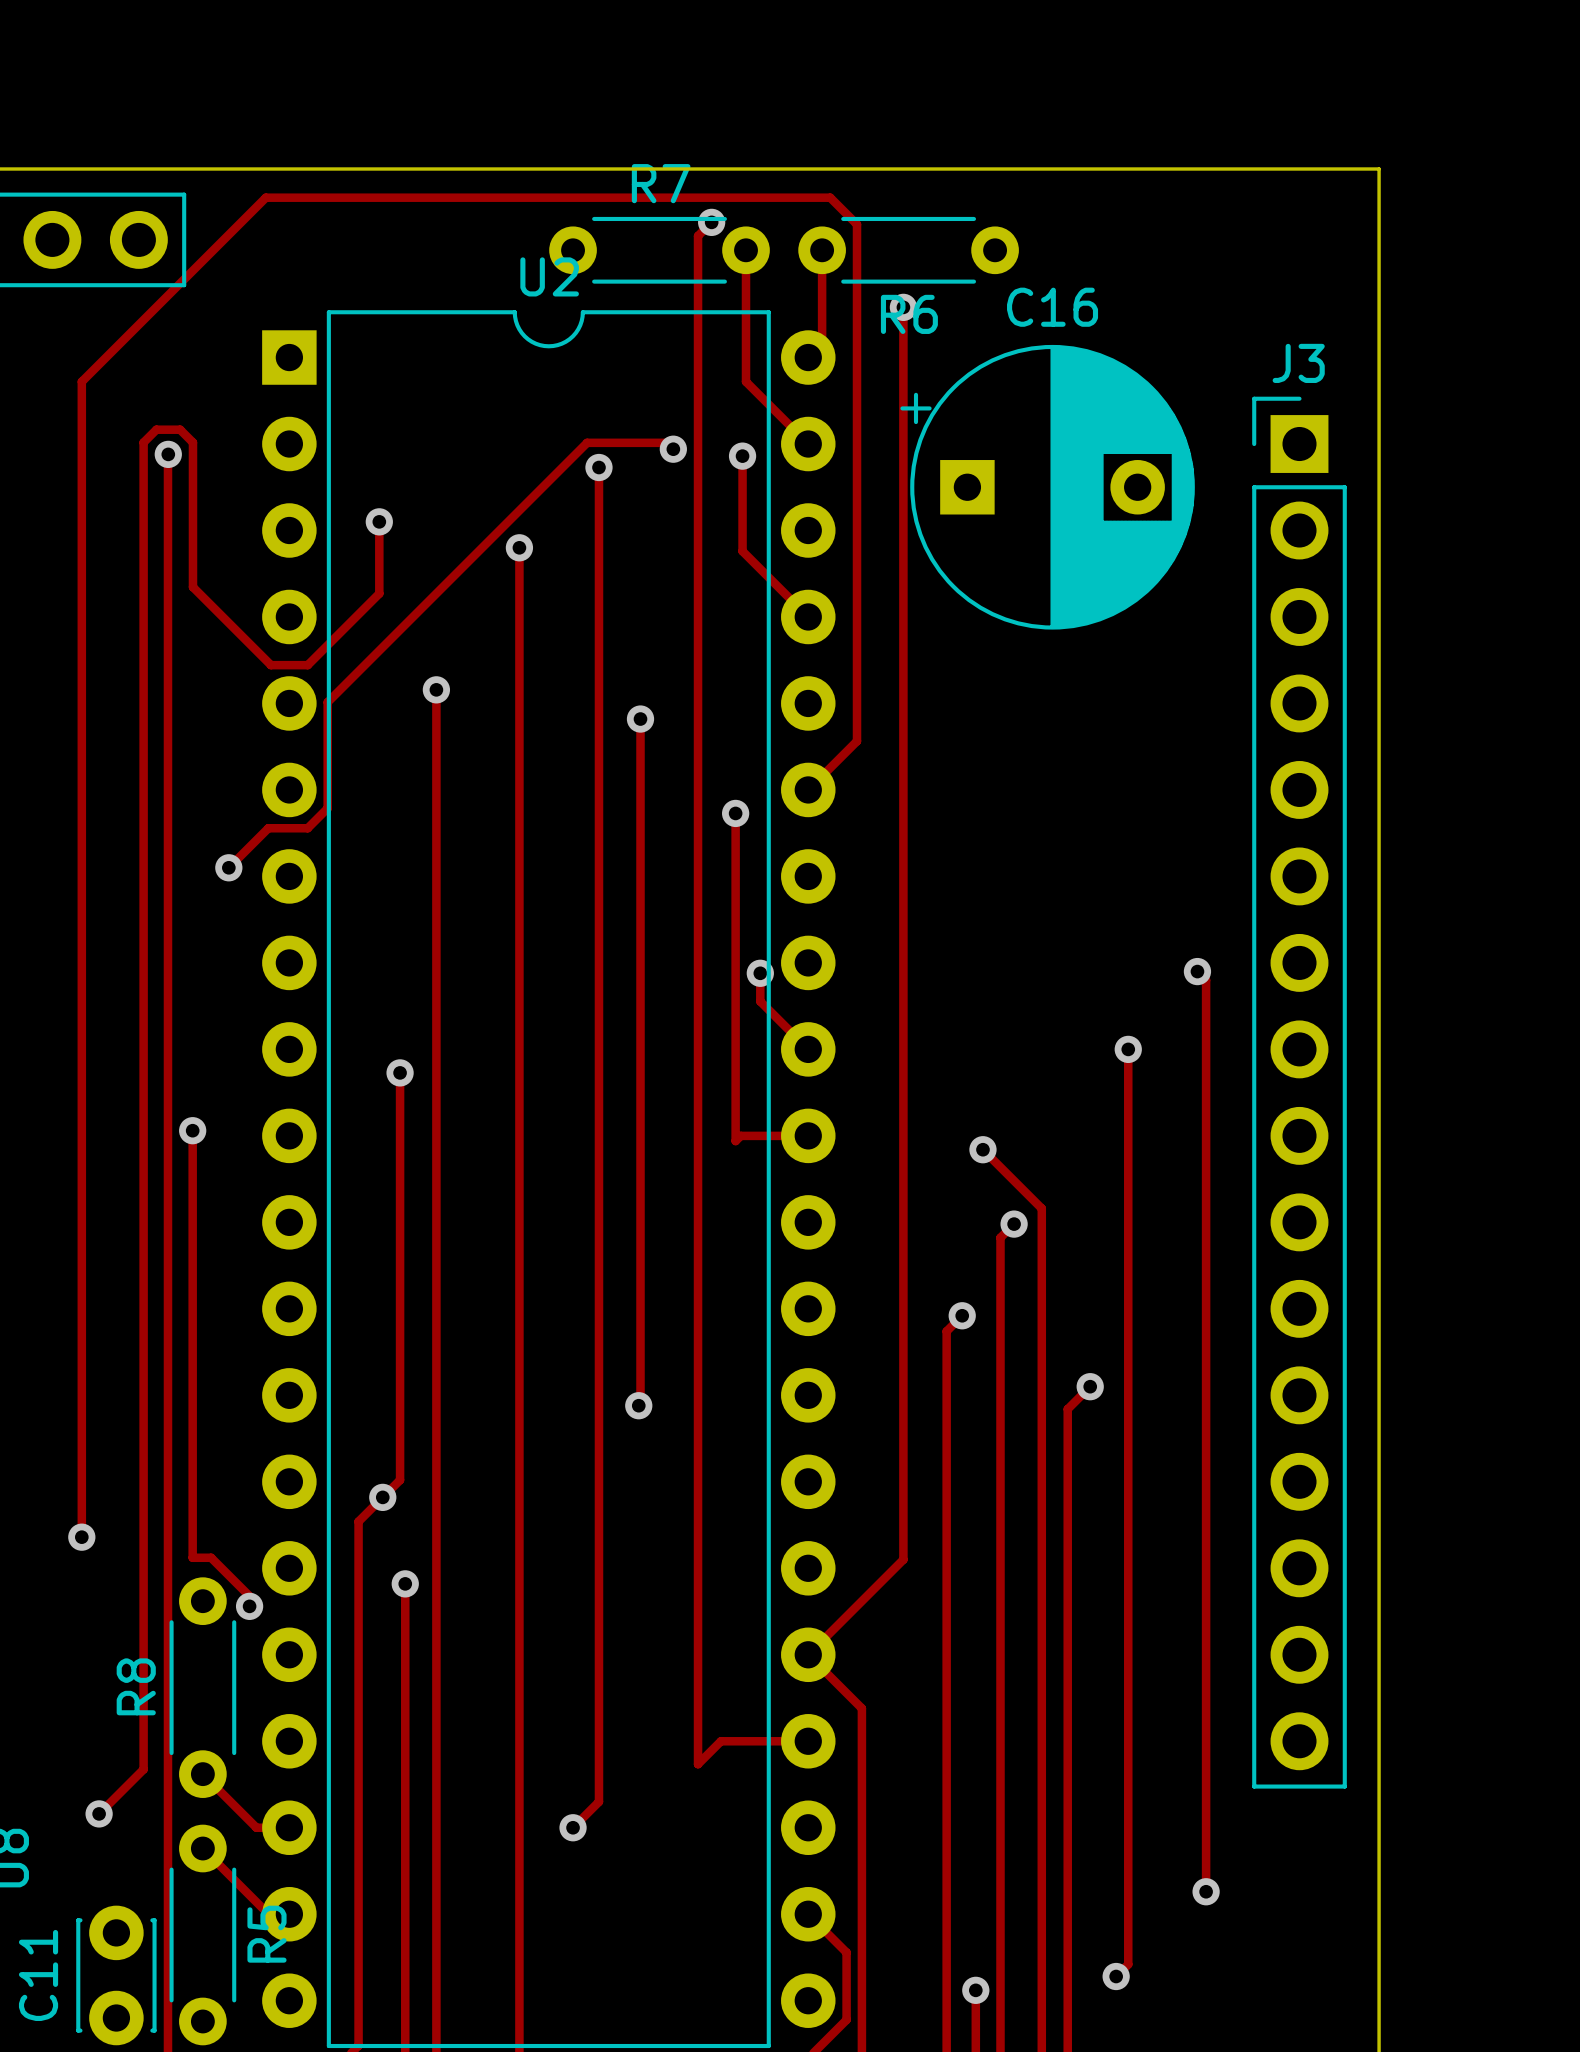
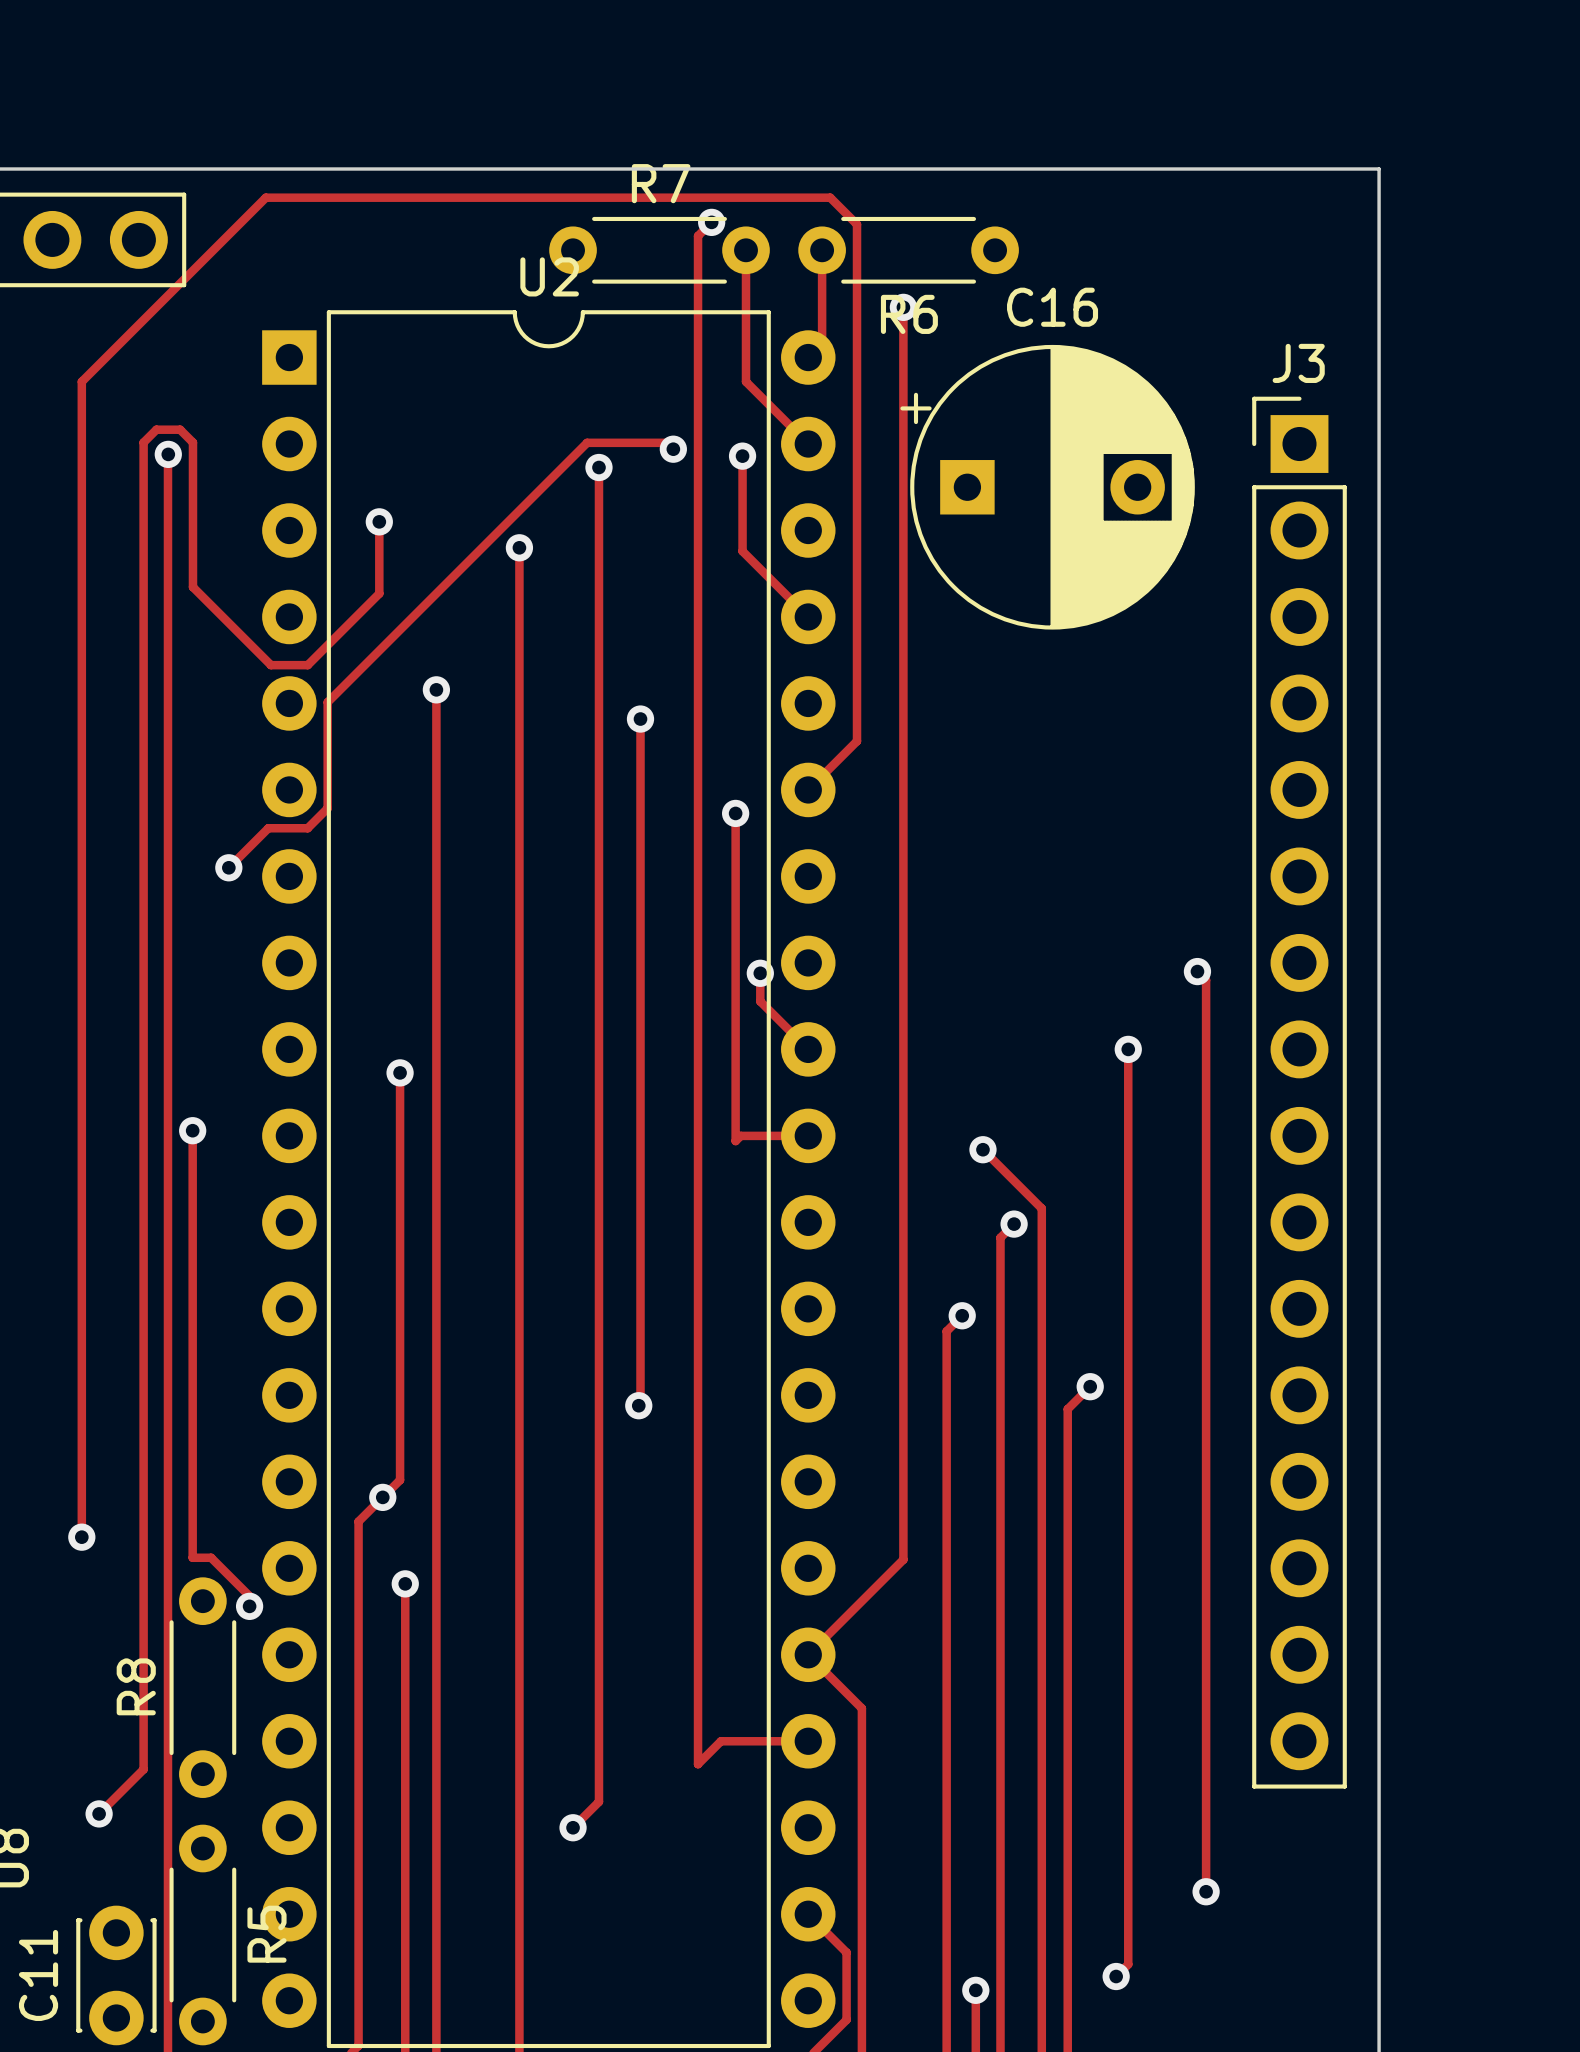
track: (202, 1774) (256, 1827) (289, 1827) -> none
track: (202, 1848) (268, 1914) (289, 1914) -> none

